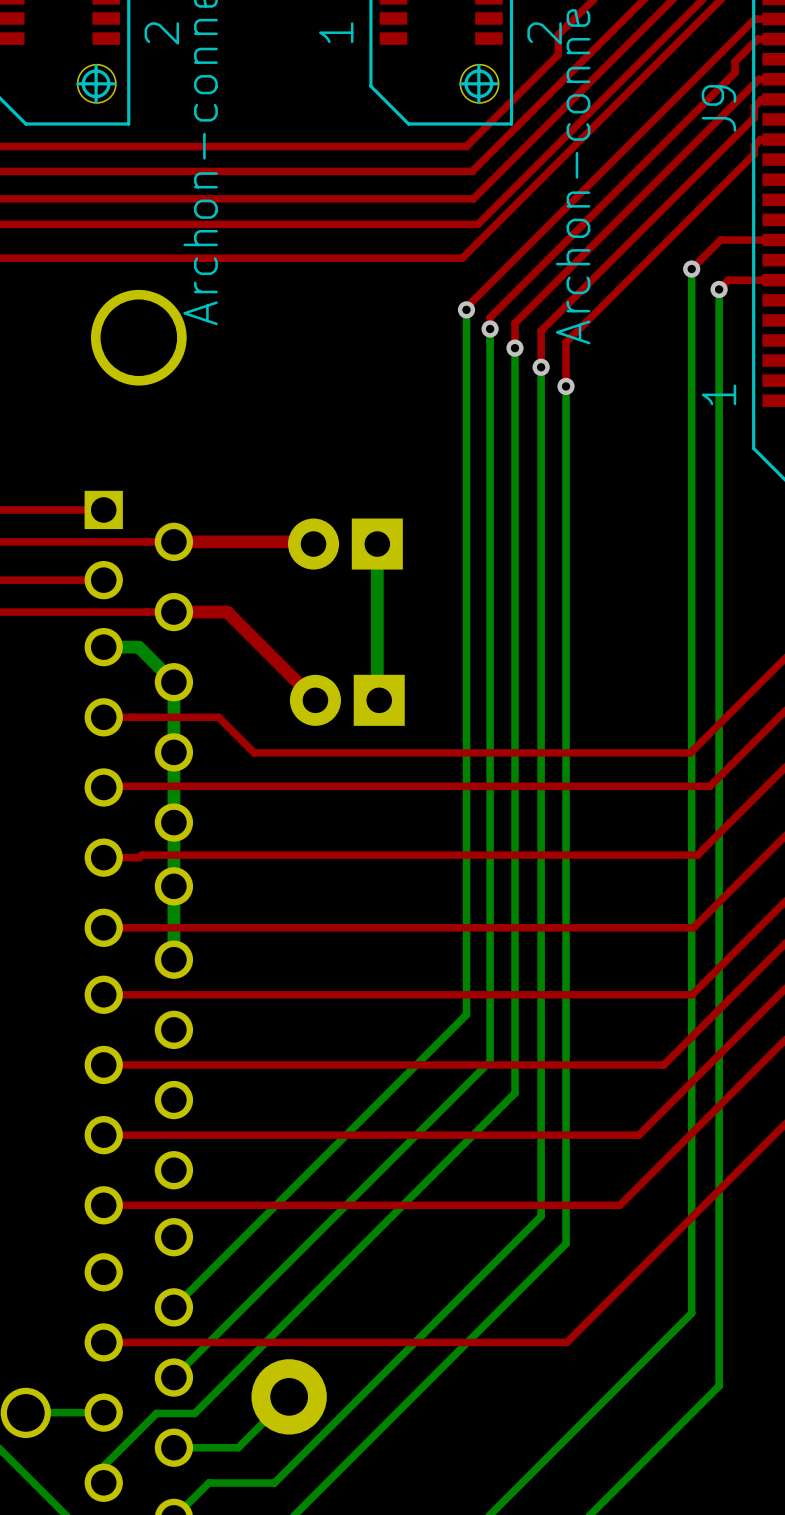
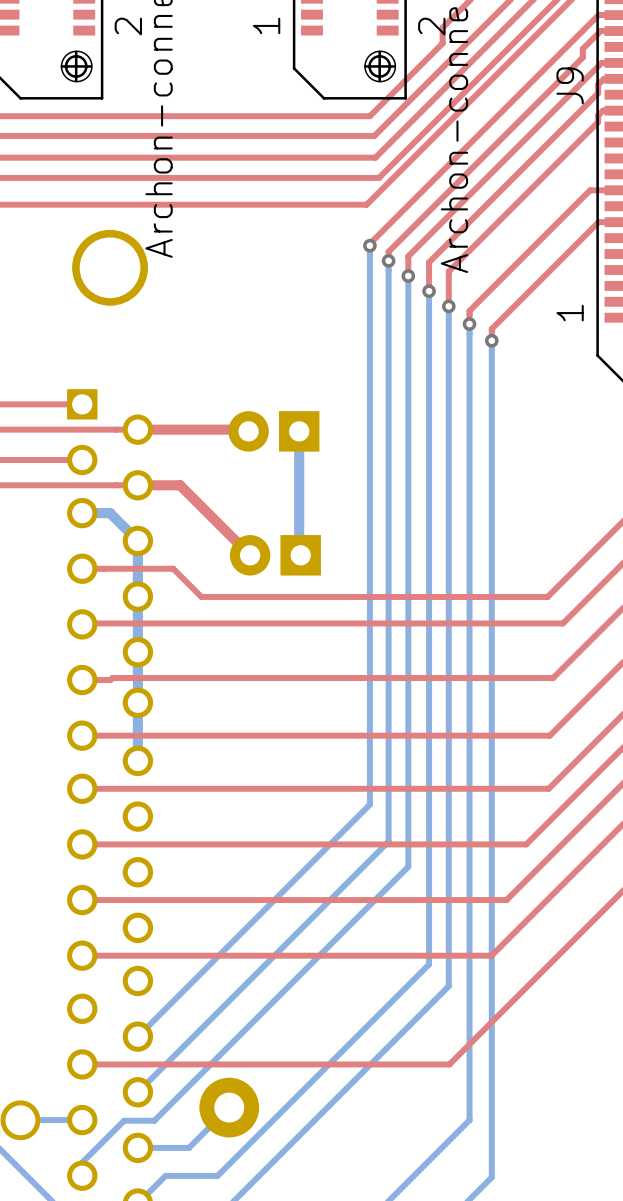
top track: (744, 240) (720, 240) (691, 269) -> (590, 190) (469, 310) (469, 324)
bottom track: (691, 269) (691, 1313) (592, 1412) -> (469, 324) (469, 1120)
via: (691, 269) -> none
top track: (754, 280) (728, 280) (719, 289) -> (598, 222) (491, 328) (491, 340)
bottom track: (719, 289) (719, 1386) (620, 1484) -> (491, 340) (491, 1177)
via: (719, 289) -> none
via: none -> (469, 324)
via: none -> (491, 340)

